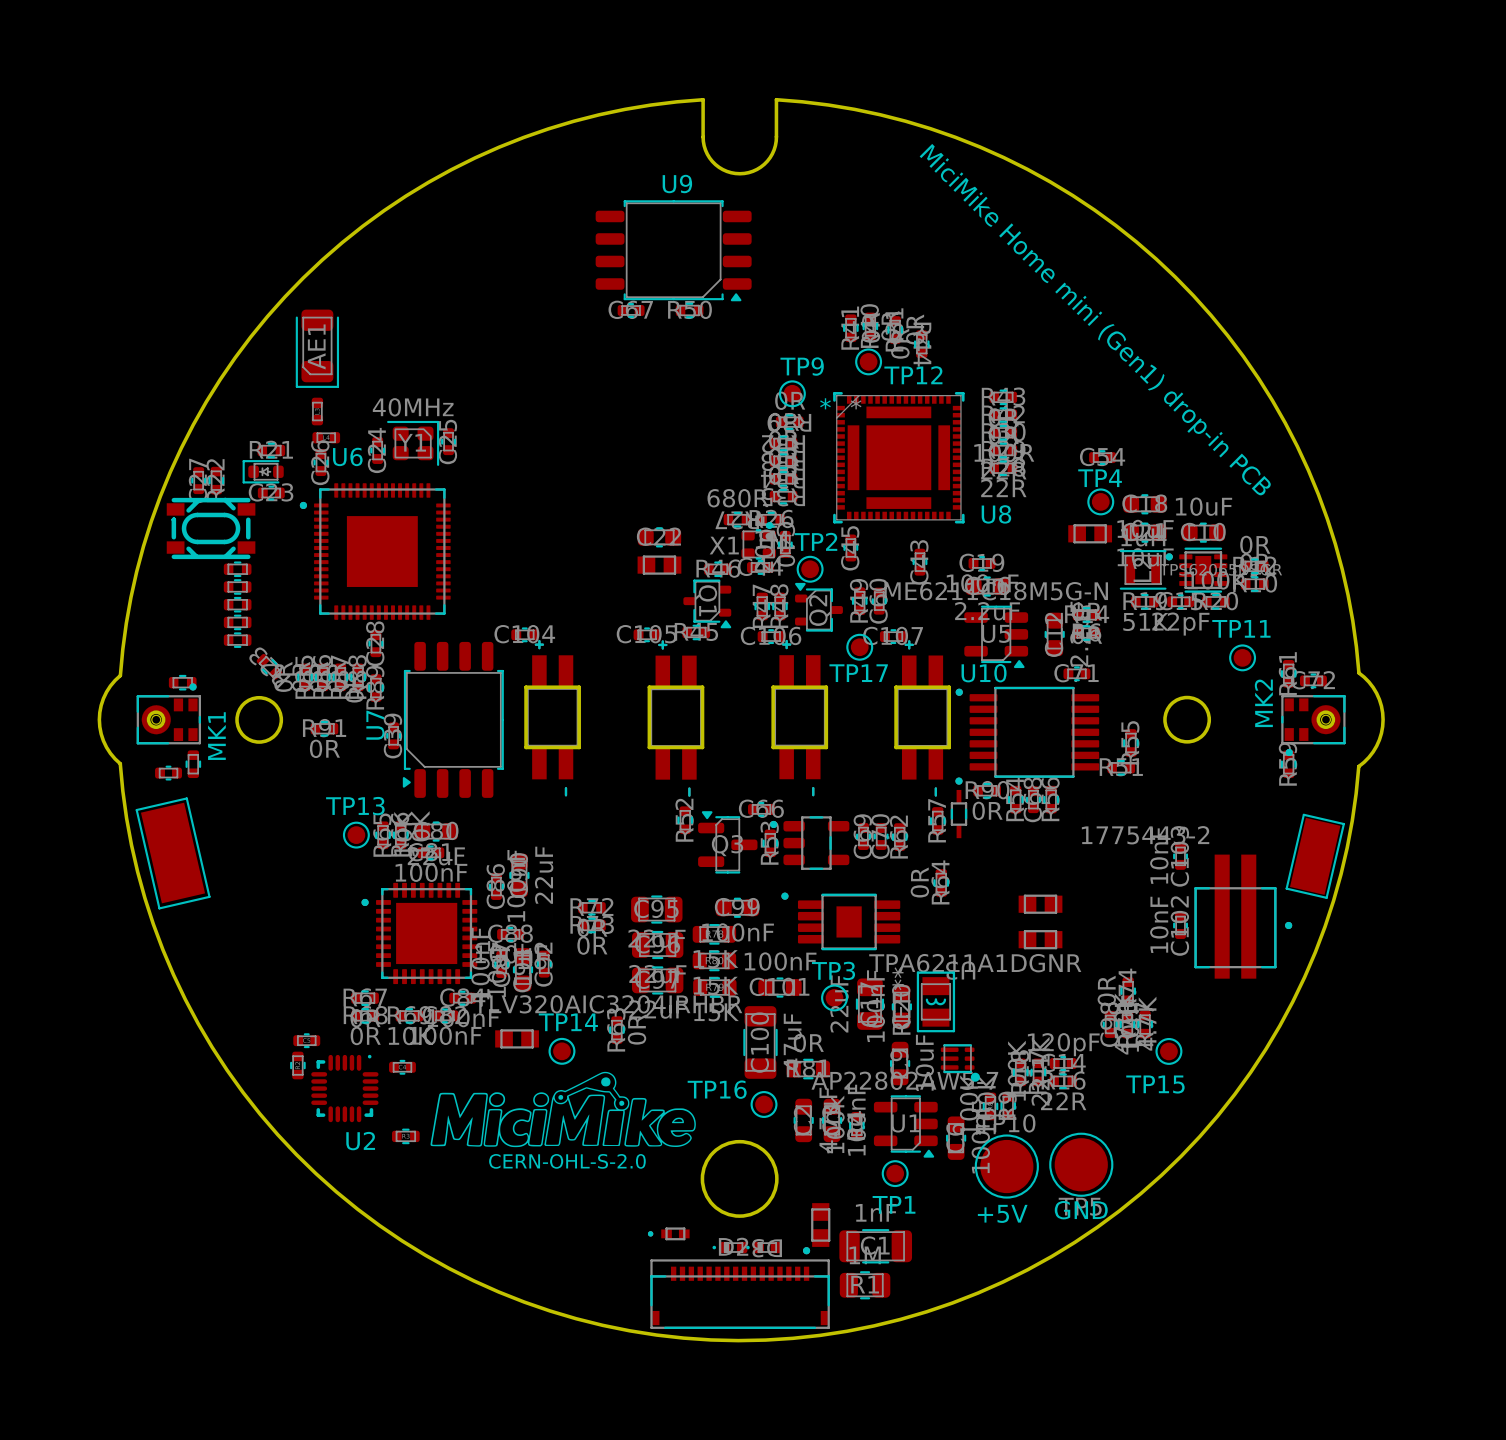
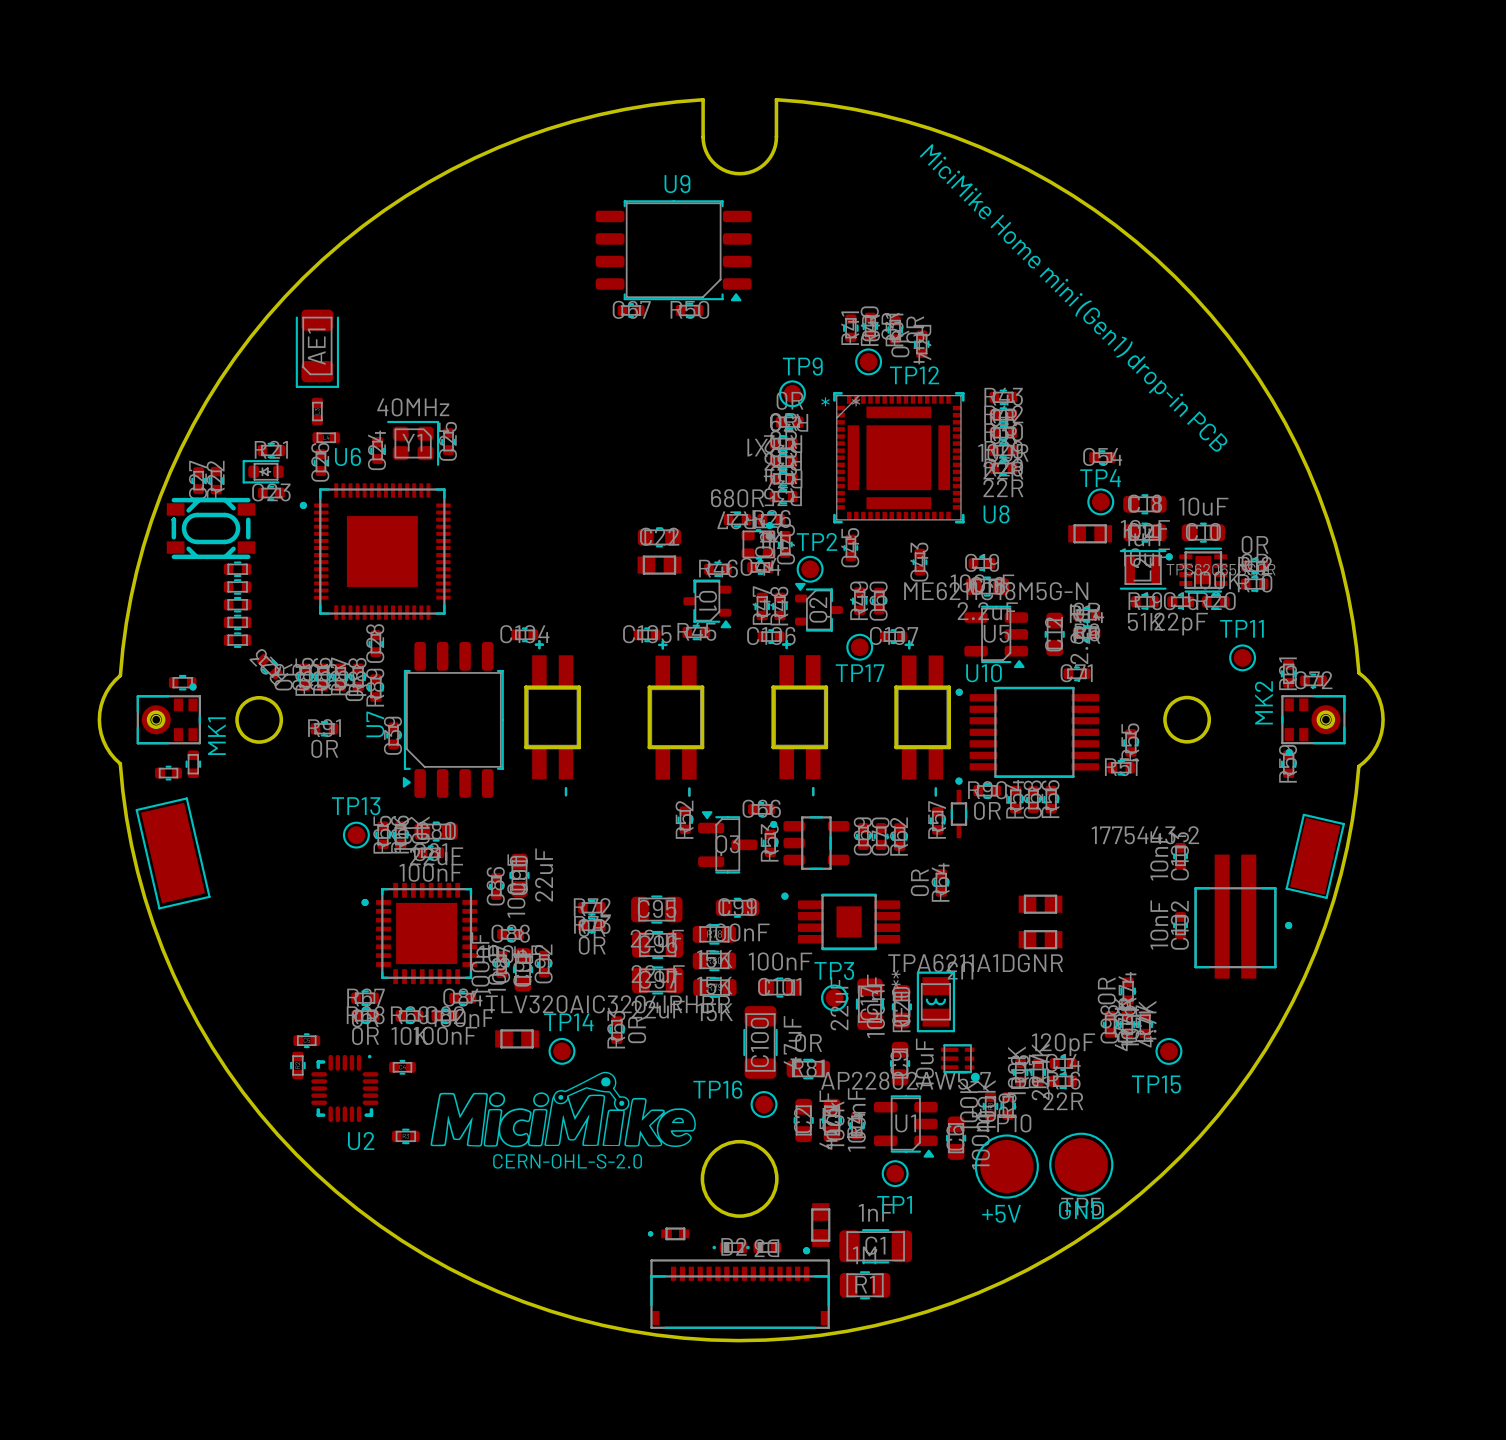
X1 name rotation: 0° (724, 545) -> 180° (757, 447)
X1 name position: X1 (724, 545) -> X1 (757, 447)

